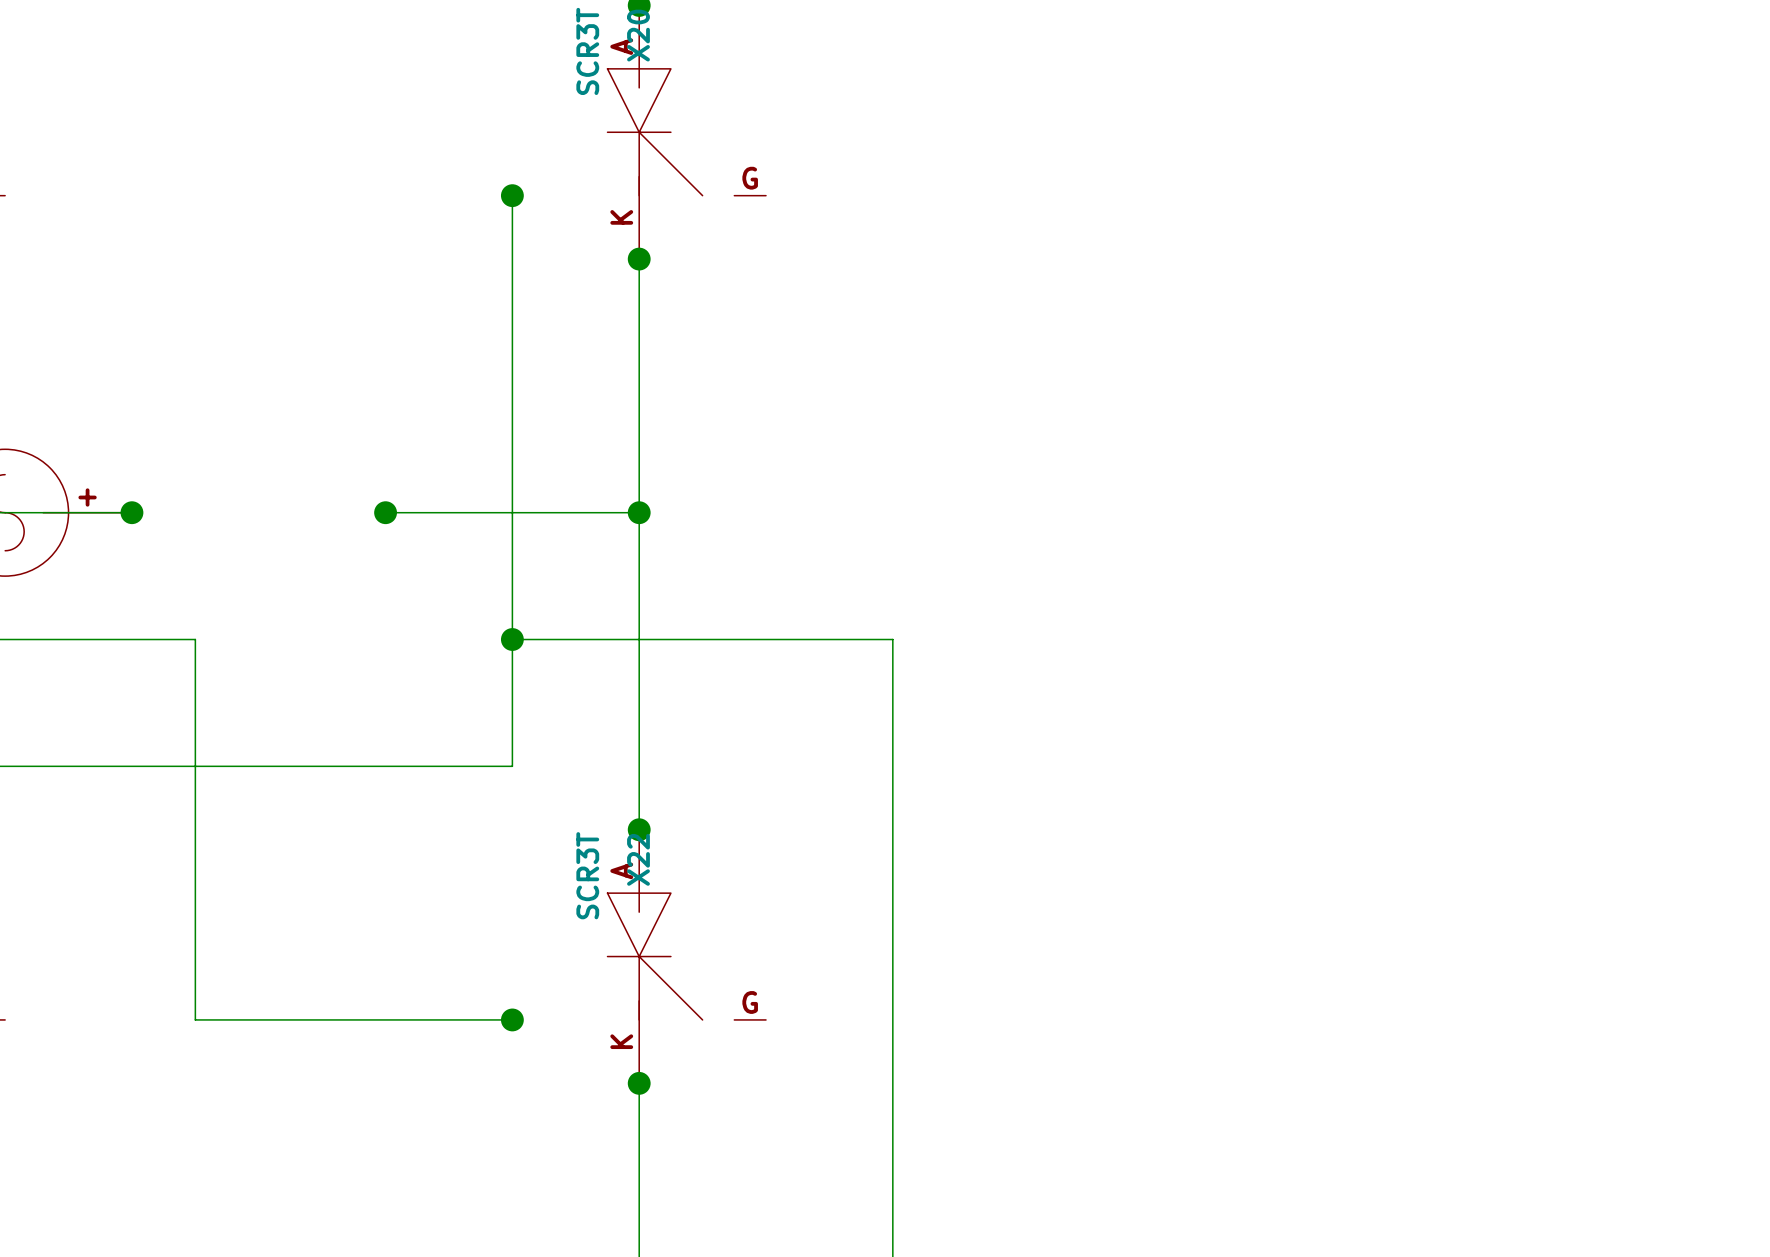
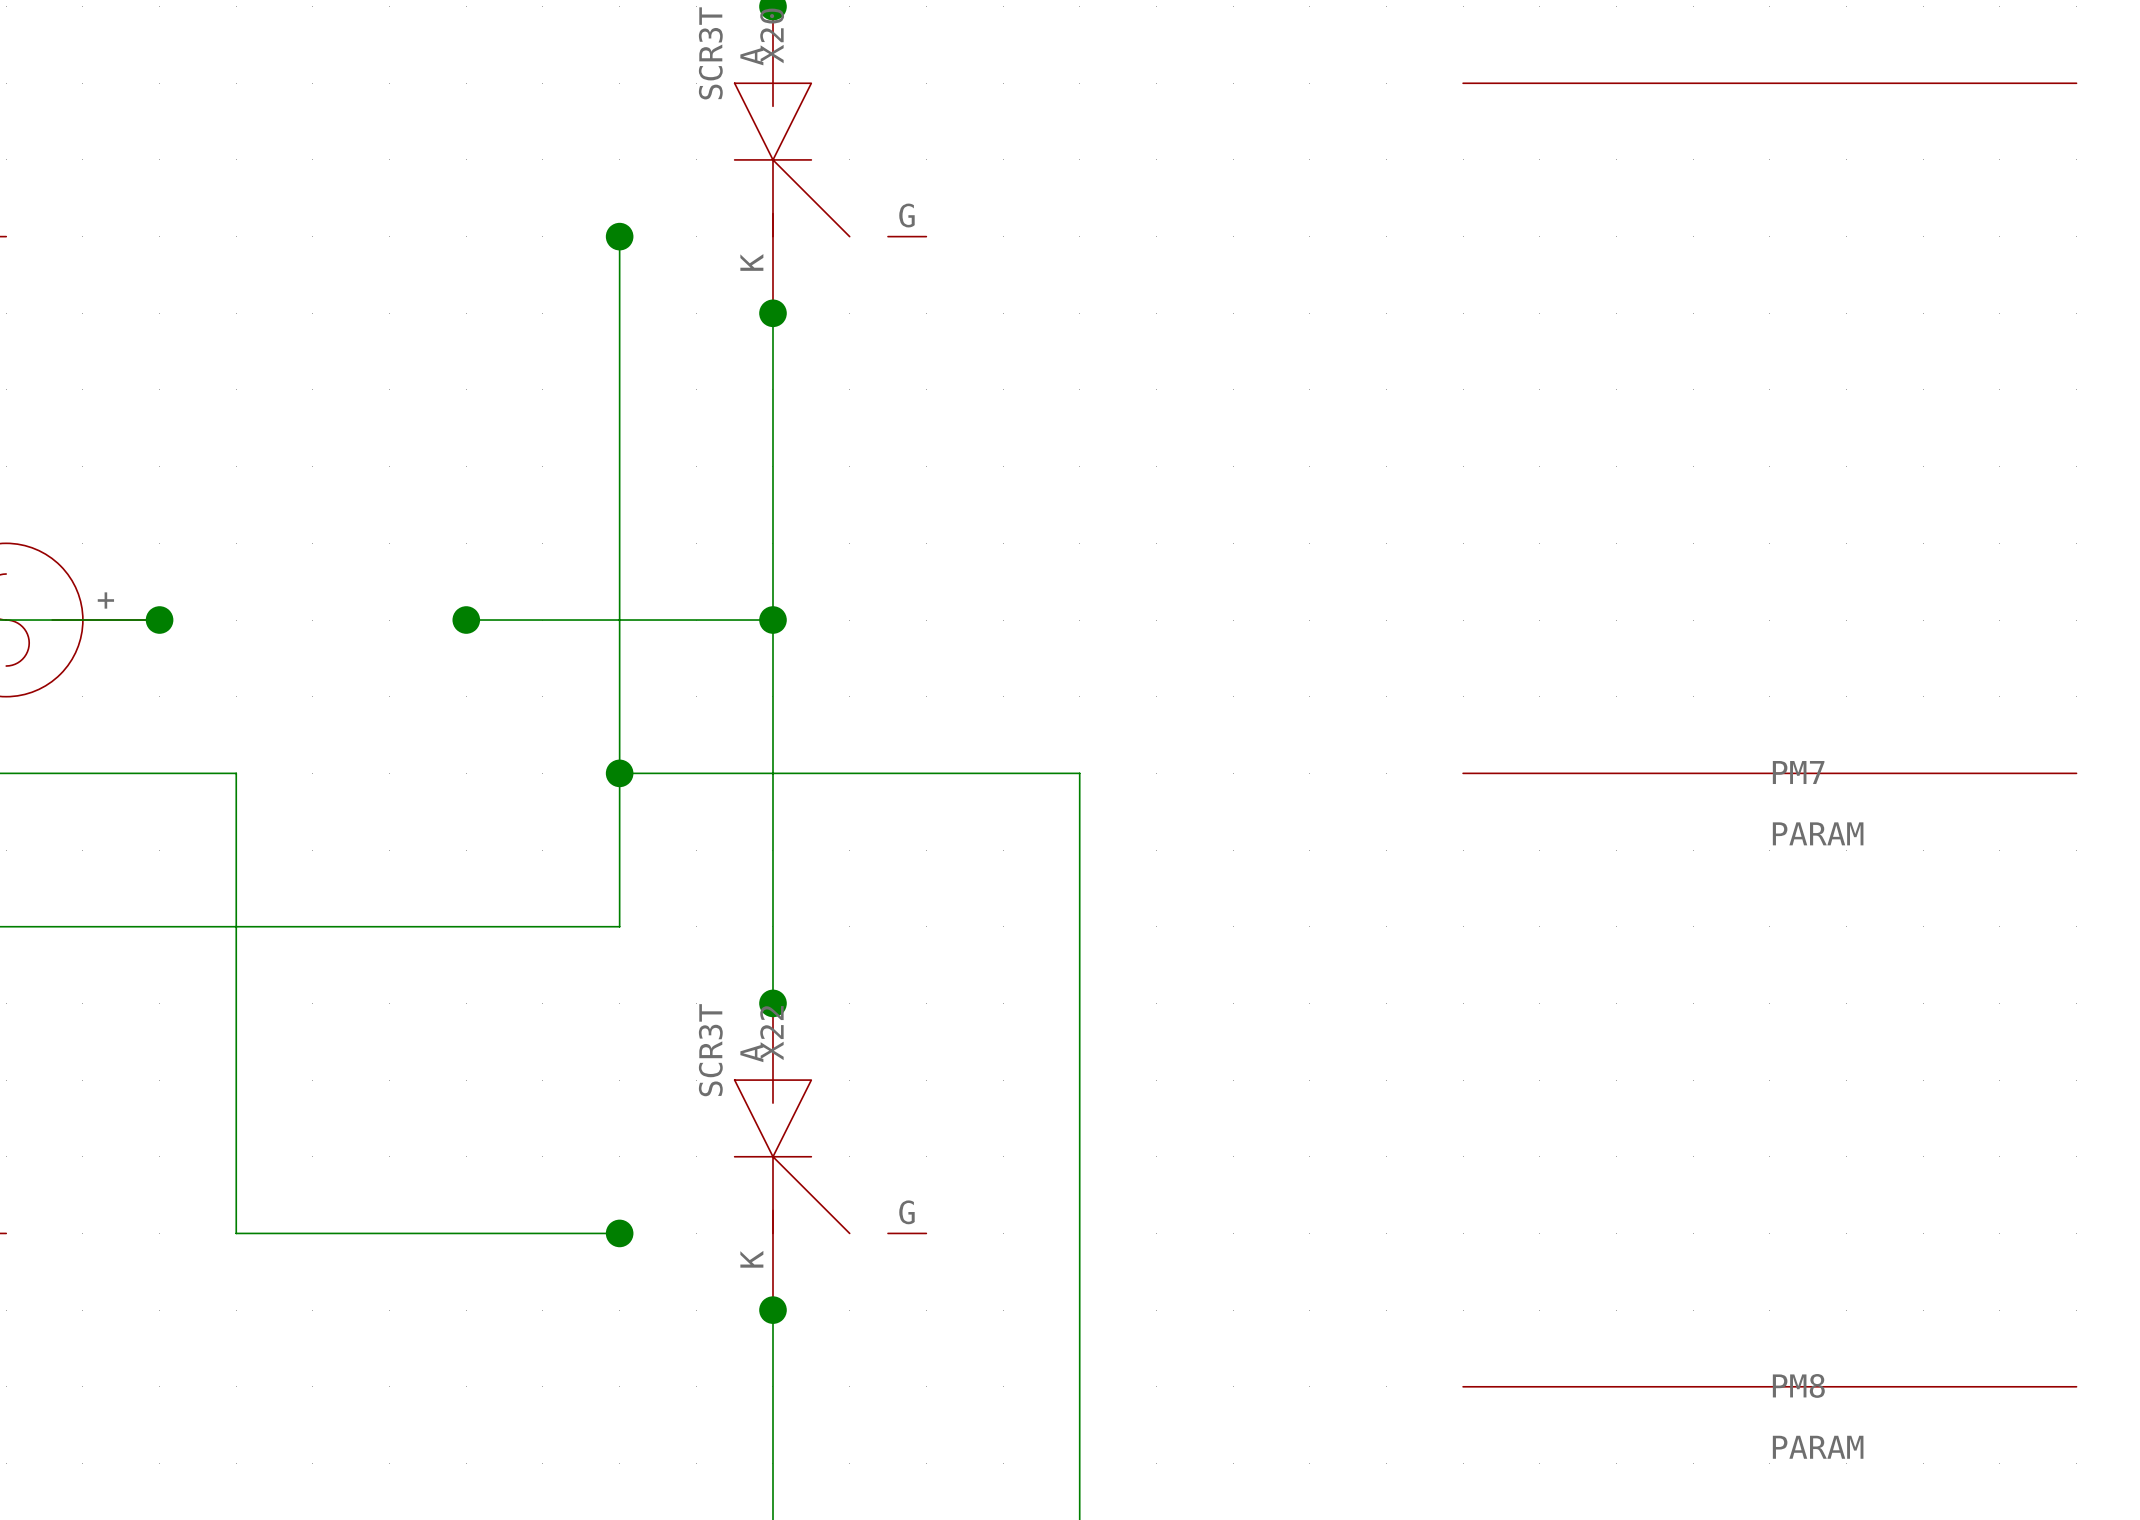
part: none -> (1769, 83)
PM7: none -> PARAM (1769, 773)
PM8: none -> PARAM (1769, 1386)

